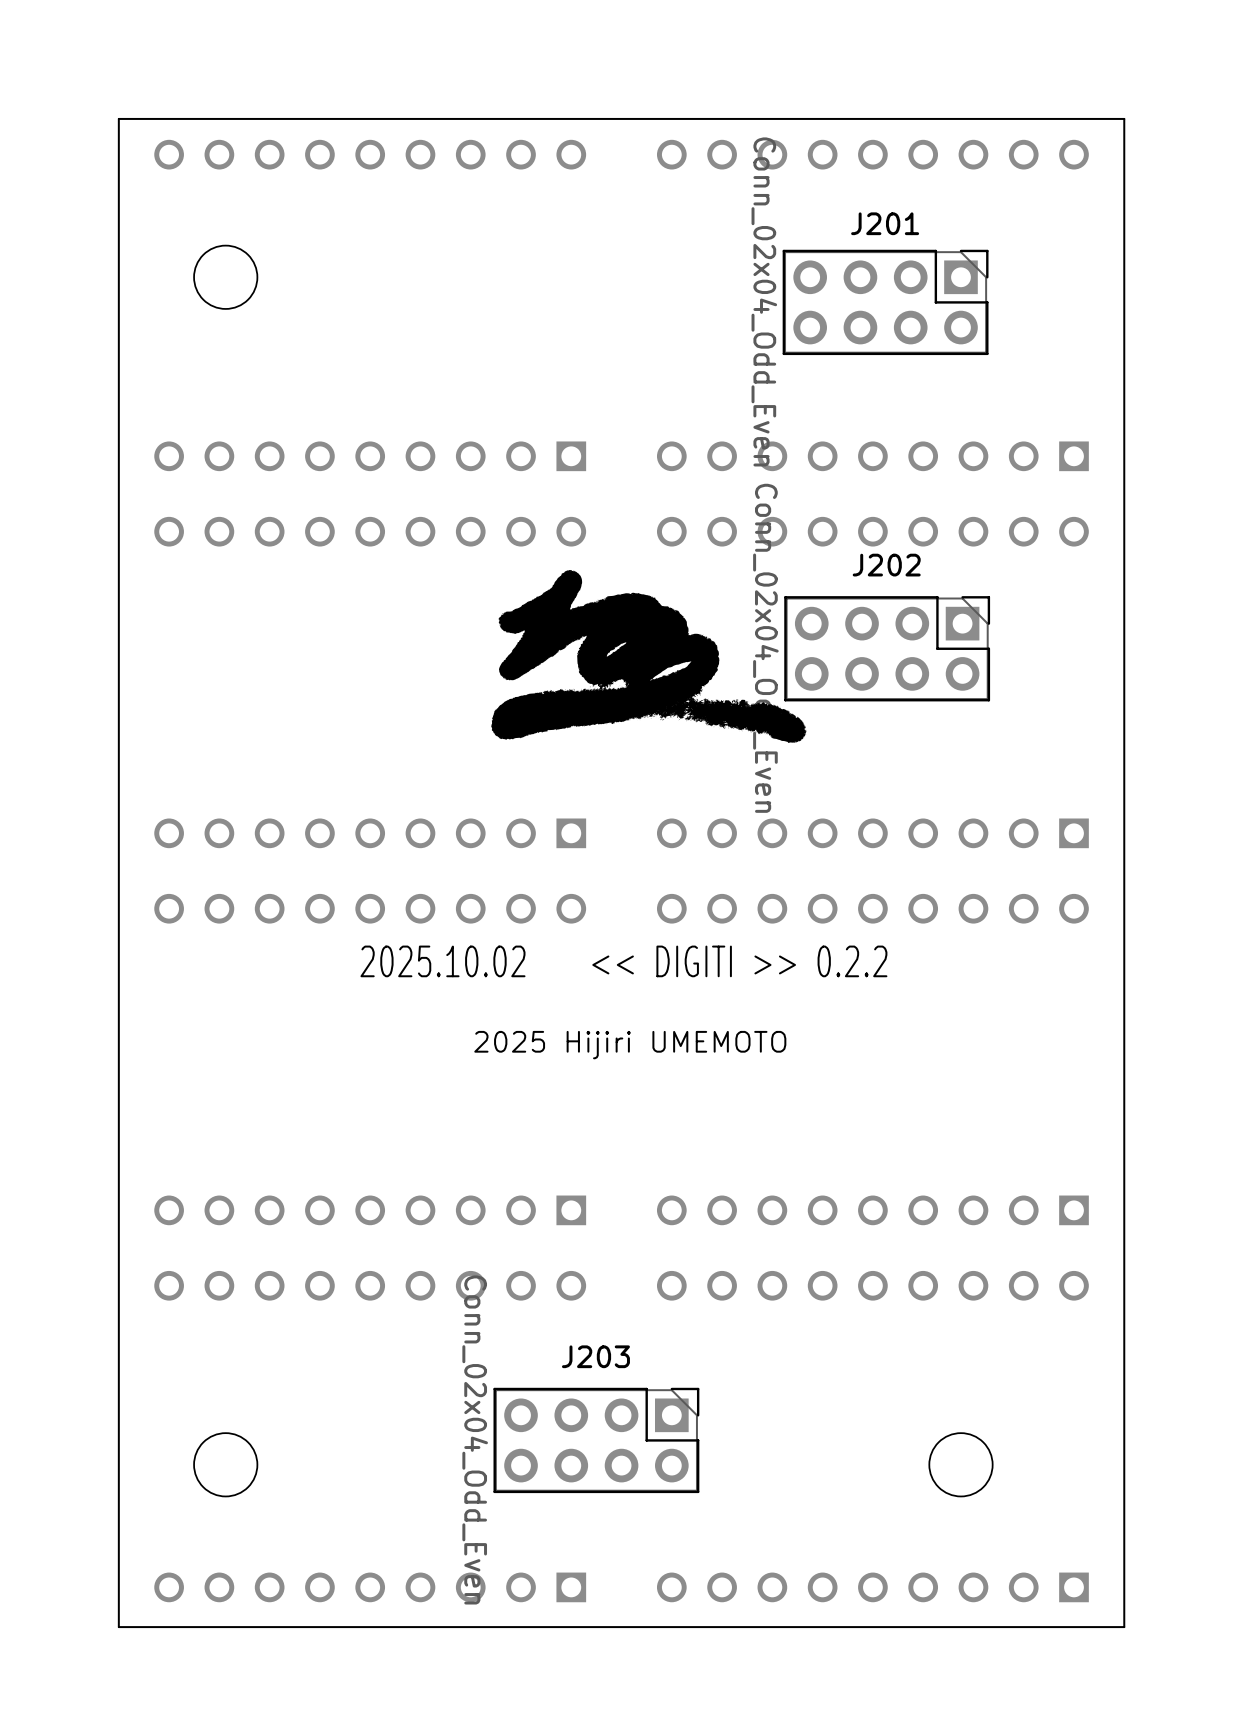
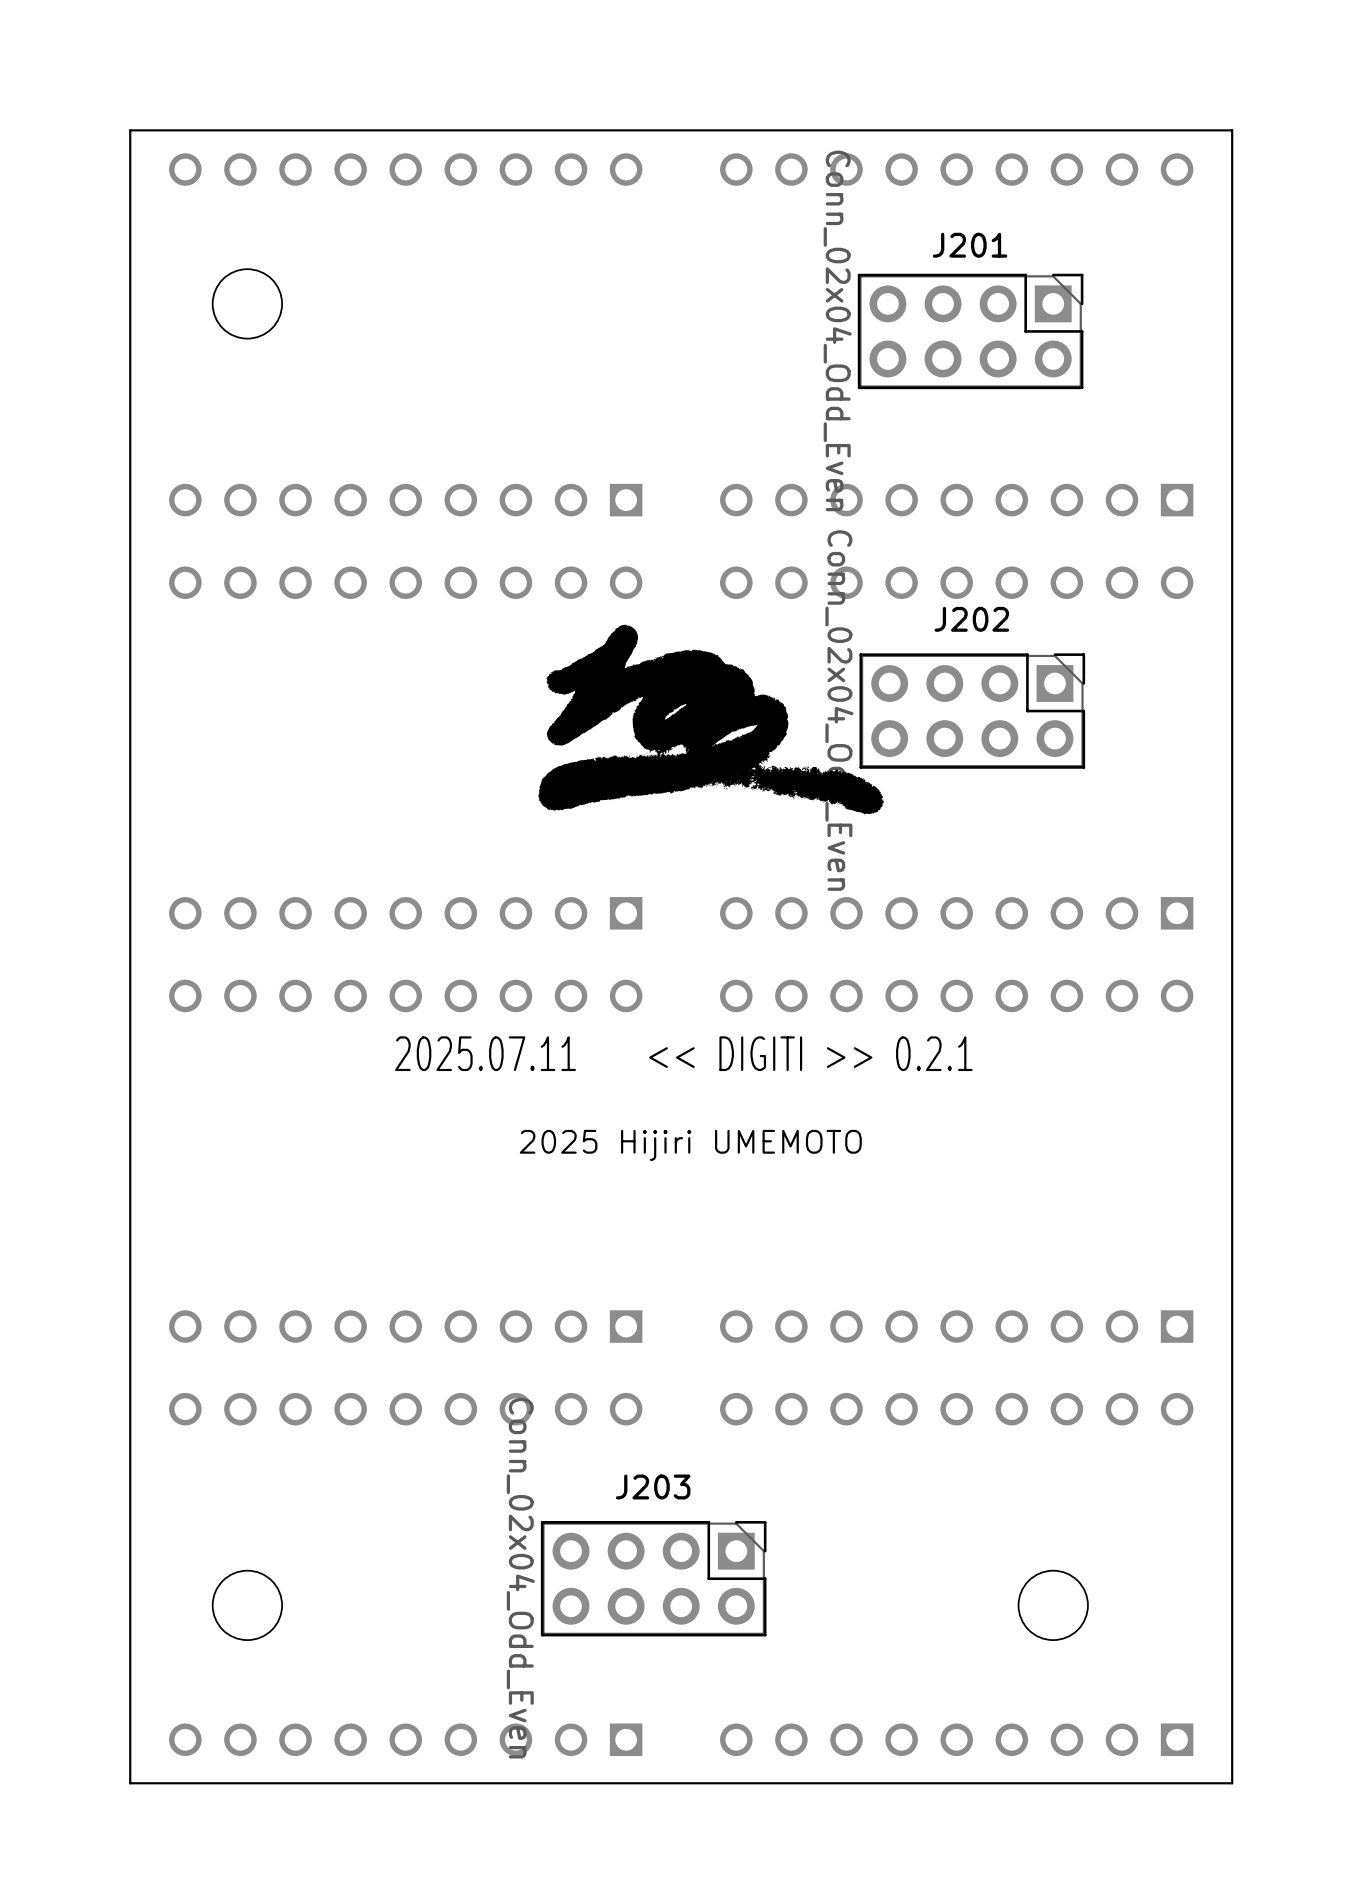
text: 2025.10.02 << DIGITI >> 0.2.2 (623, 961) -> 2025.07.11 << DIGITI >> 0.2.1 (683, 1053)

